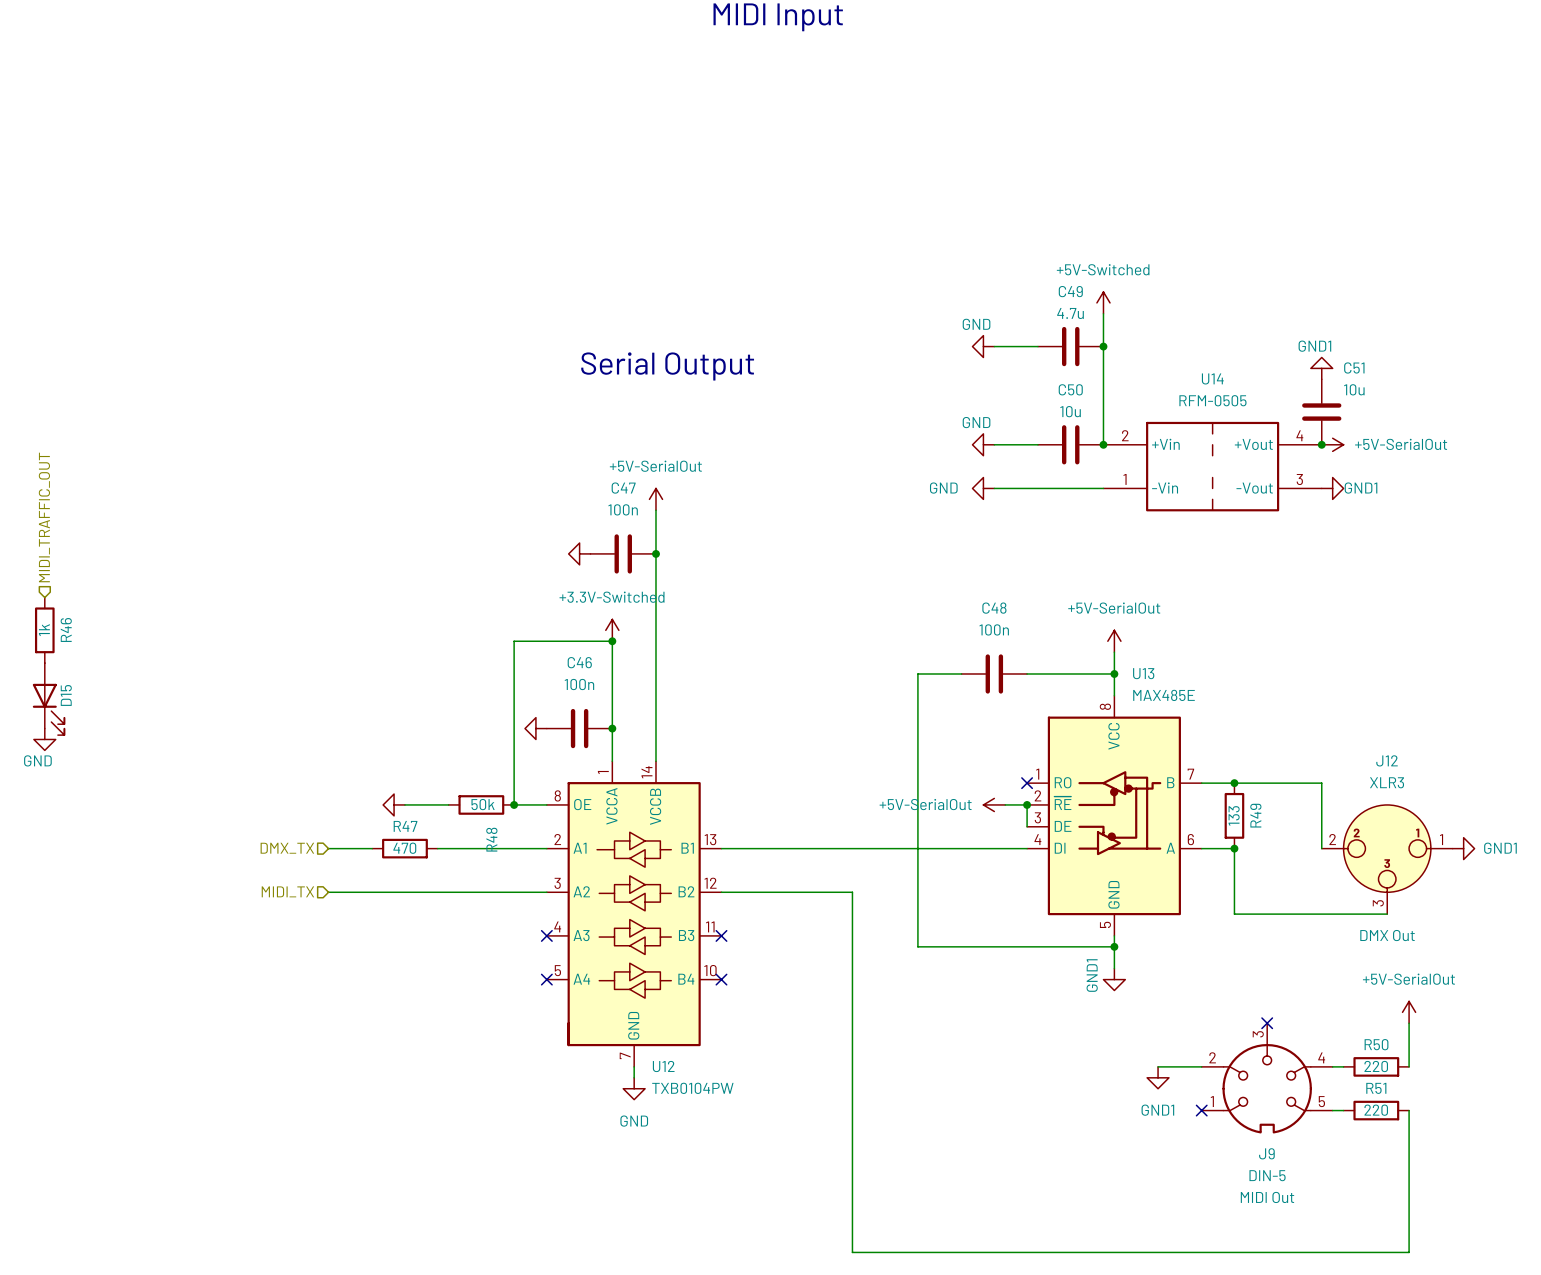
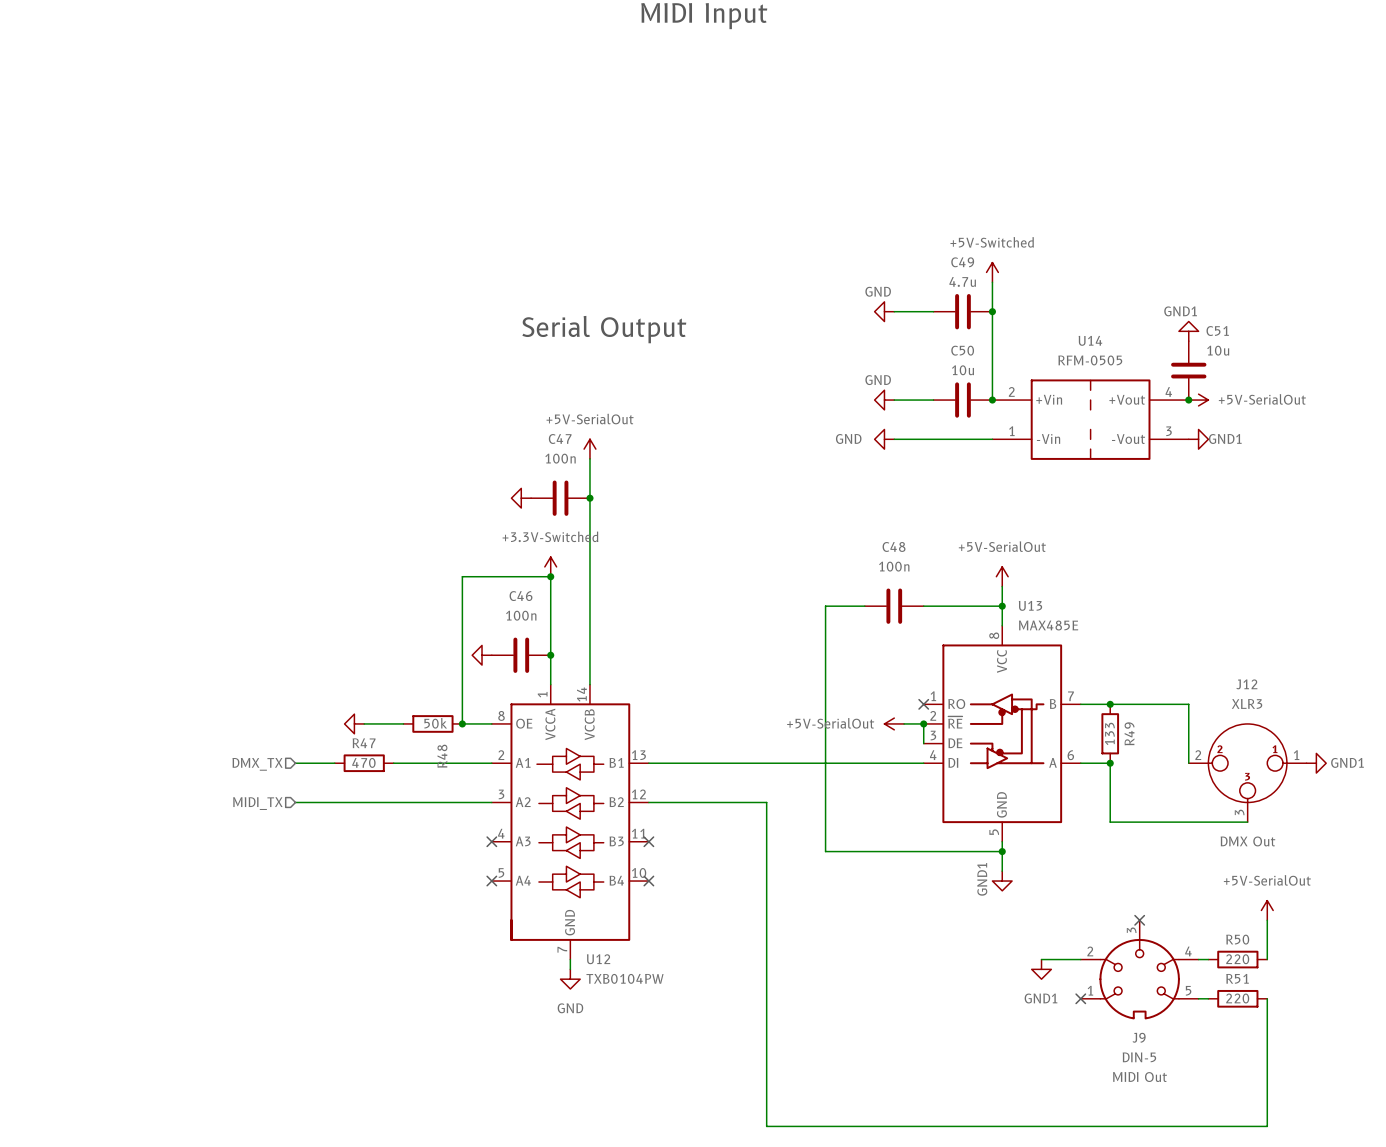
hierarchical label: MIDI_TRAFFIC_OUT (44, 517) -> none
R46: 1k (44, 630) -> none
D15: (48, 699) -> none
power symbol: GND (44, 739) -> none

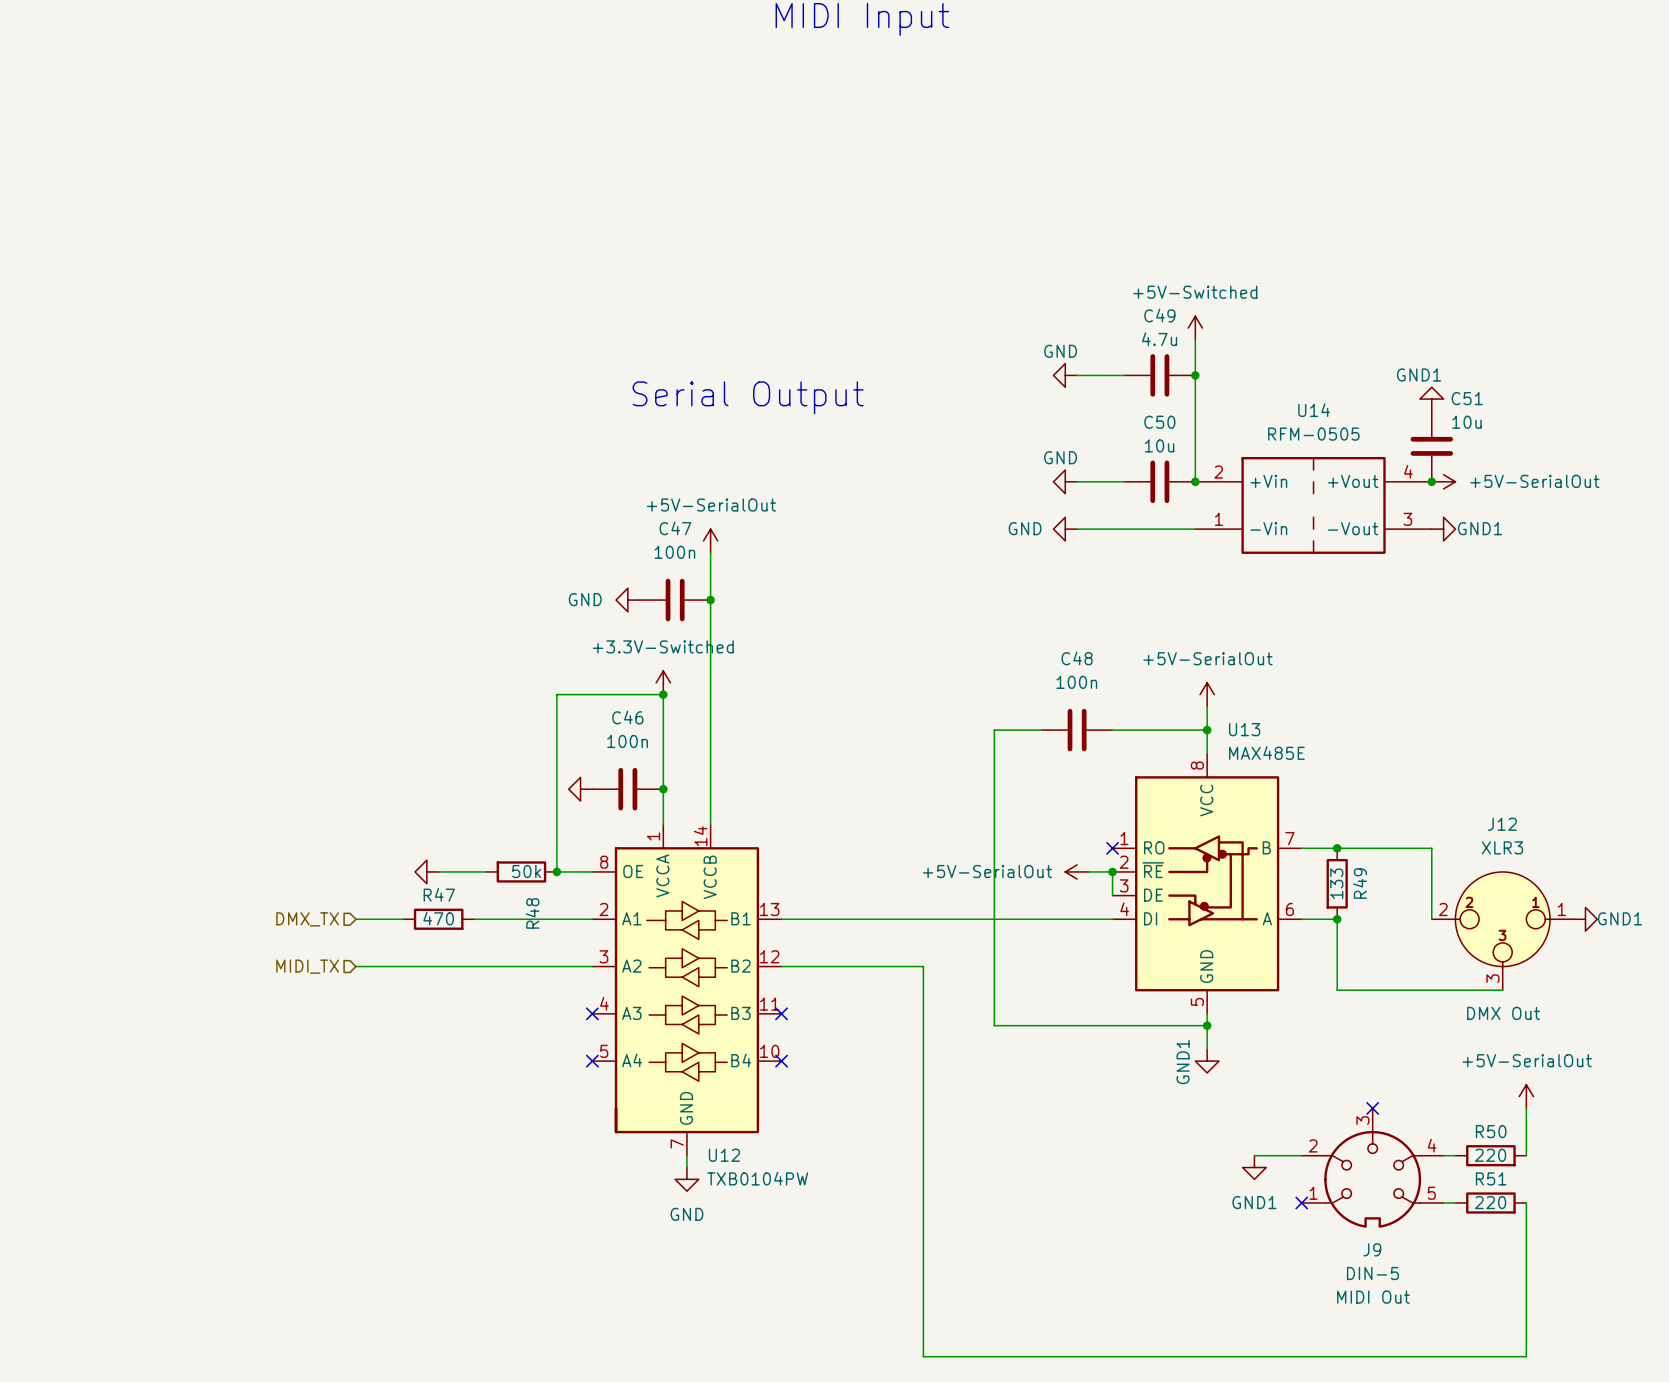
power symbol text: none -> GND (585, 599)

